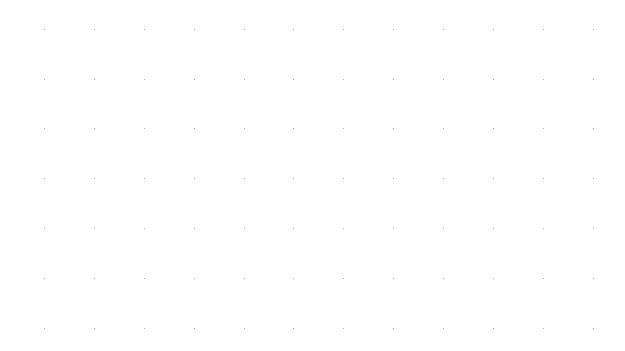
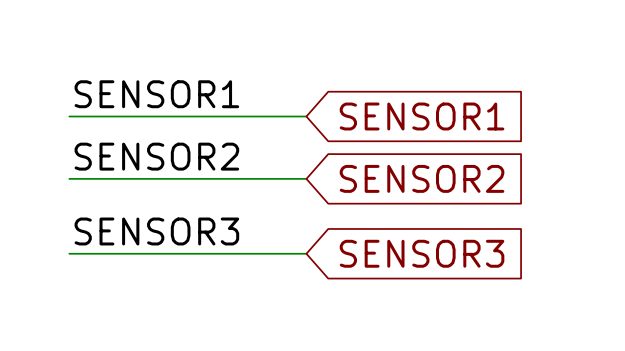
label: none -> SENSOR1 (156, 94)
wire: none -> (69, 116) (306, 116)
global label: none -> SENSOR1 (422, 116)
label: none -> SENSOR2 (156, 156)
wire: none -> (69, 178) (306, 178)
global label: none -> SENSOR2 (422, 178)
label: none -> SENSOR3 (156, 231)
wire: none -> (69, 253) (306, 253)
global label: none -> SENSOR3 (422, 253)

